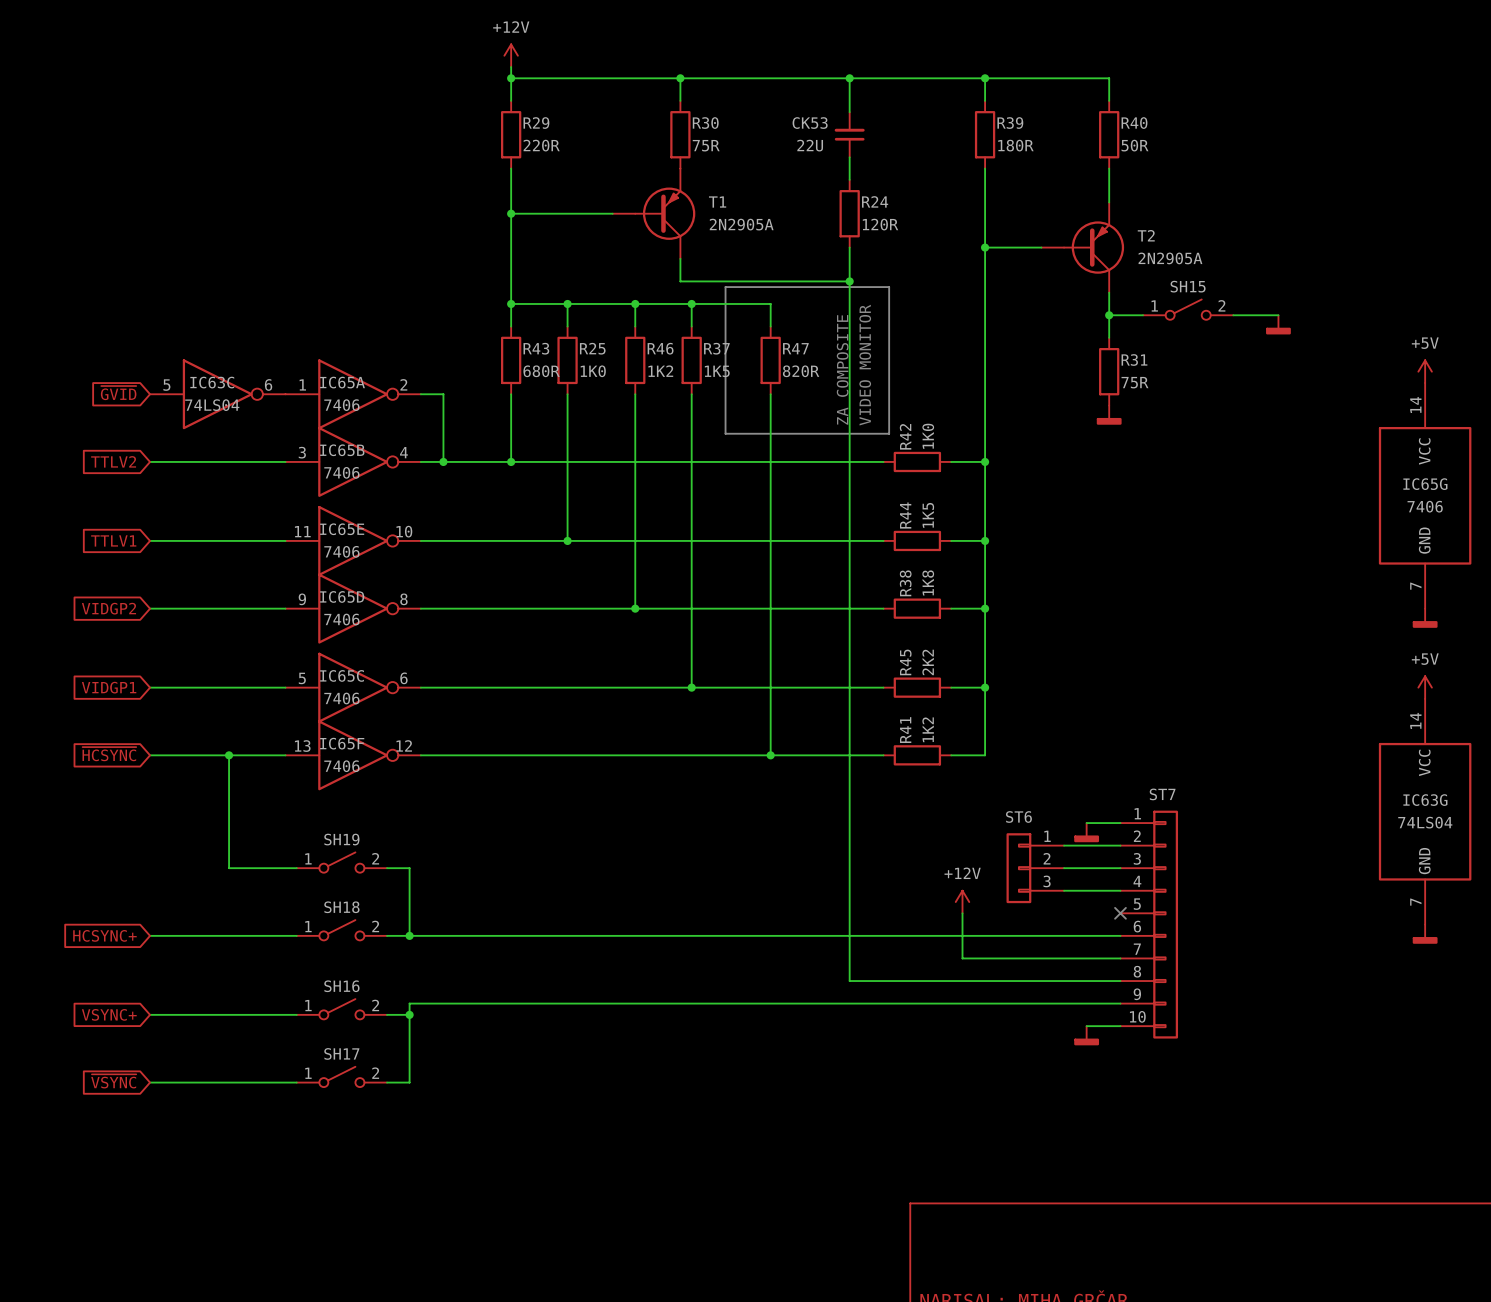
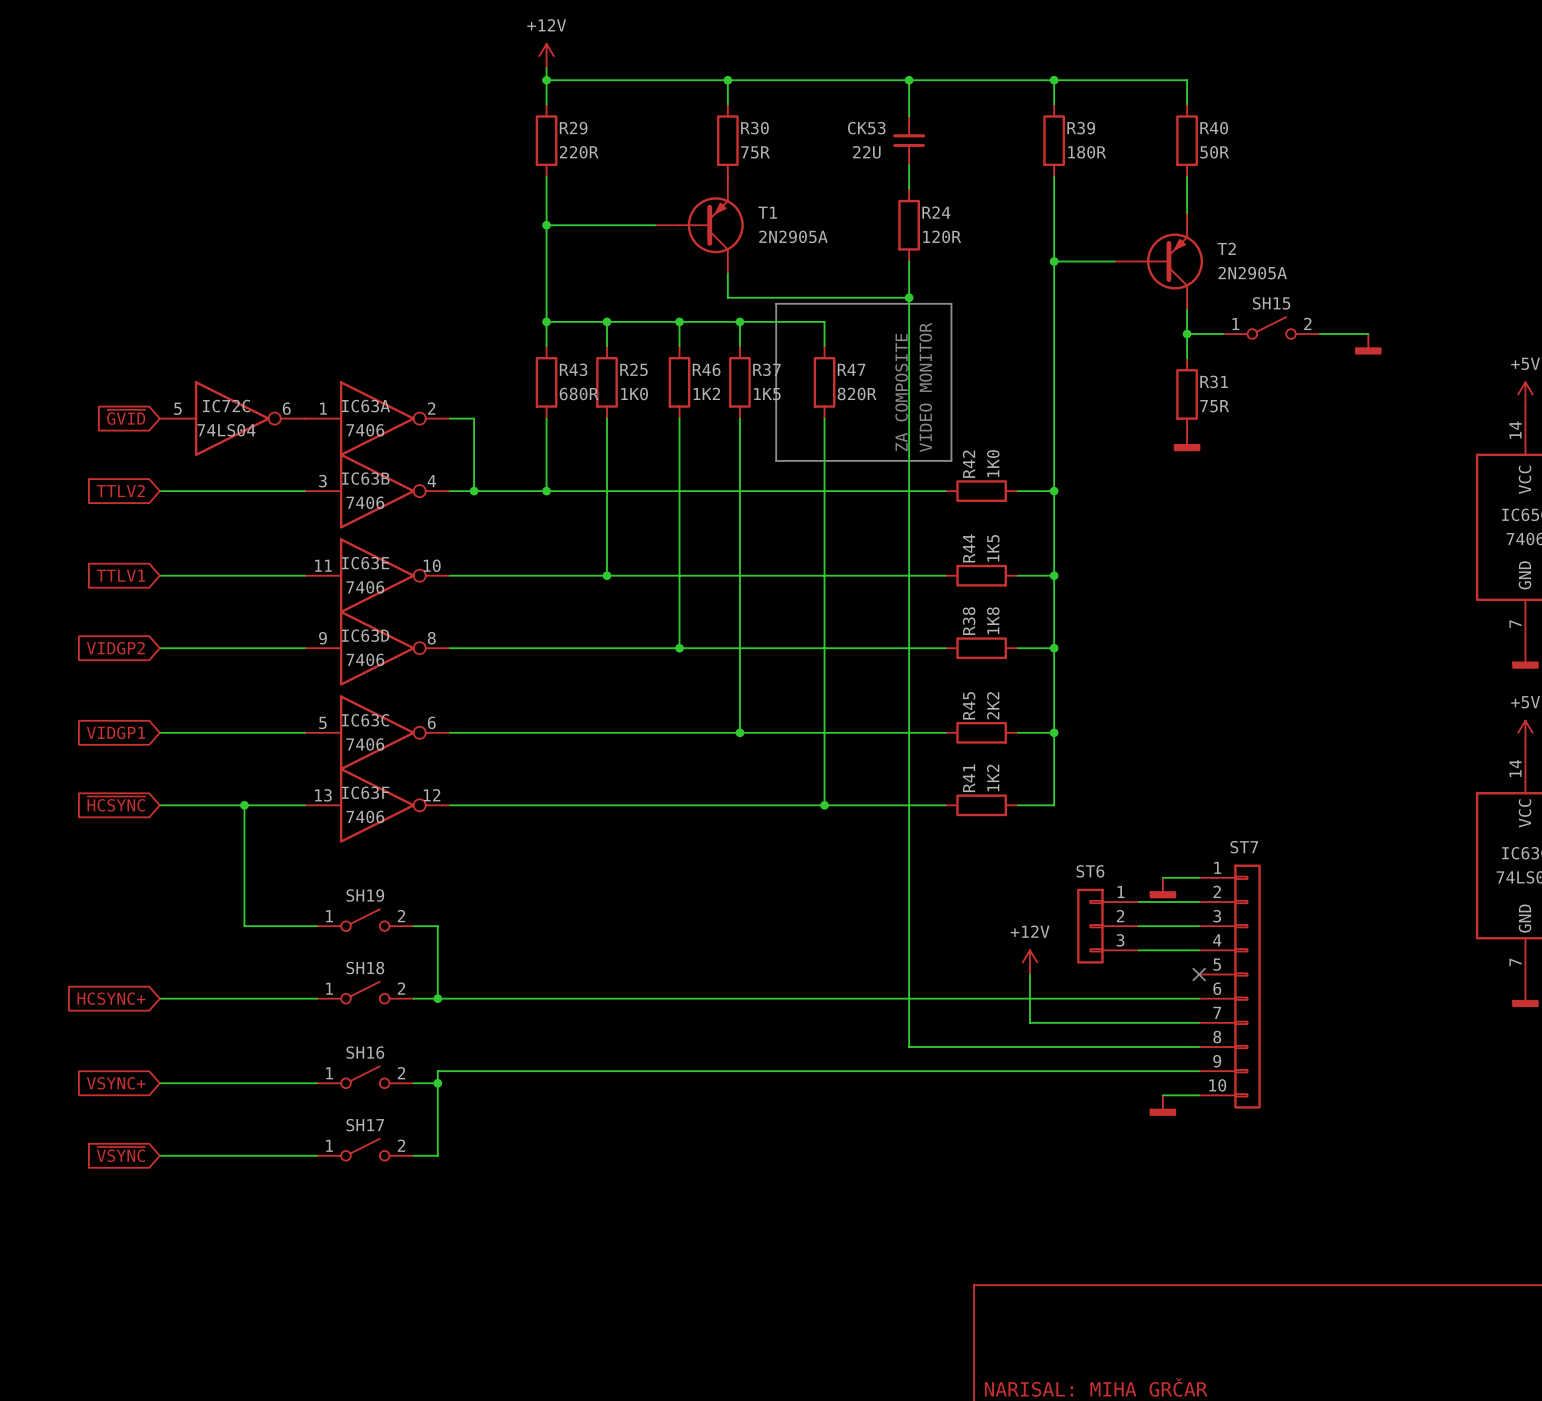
IC63C name: IC63C (212, 382) -> IC72C (226, 406)
IC65A name: IC65A (342, 382) -> IC63A (365, 406)
IC65B name: IC65B (342, 450) -> IC63B (365, 478)
IC65E name: IC65E (342, 529) -> IC63E (365, 563)
IC65D name: IC65D (342, 596) -> IC63D (365, 635)
IC65C name: IC65C (342, 675) -> IC63C (365, 720)
IC65F name: IC65F (342, 743) -> IC63F (365, 792)

